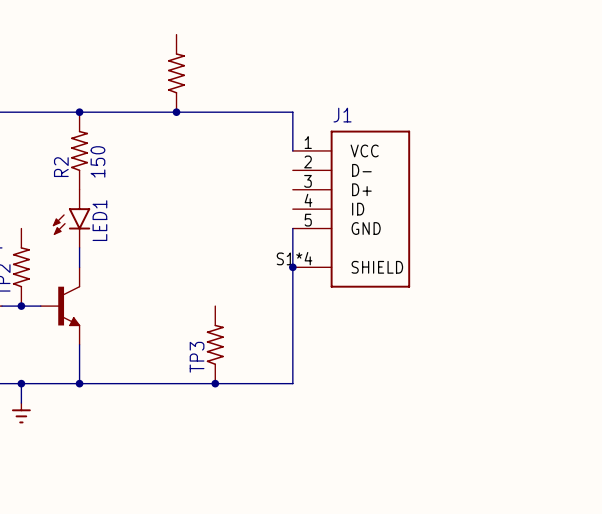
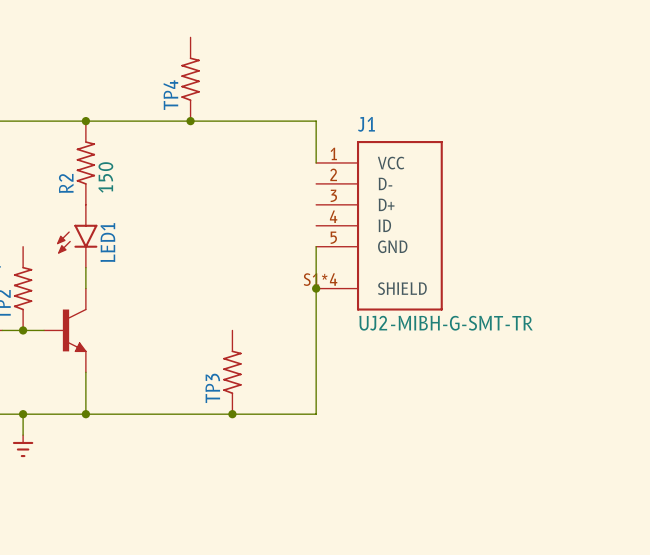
TP4 name: none -> TP4 (170, 95)
J1 value: none -> UJ2-MIBH-G-SMT-TR (446, 323)

